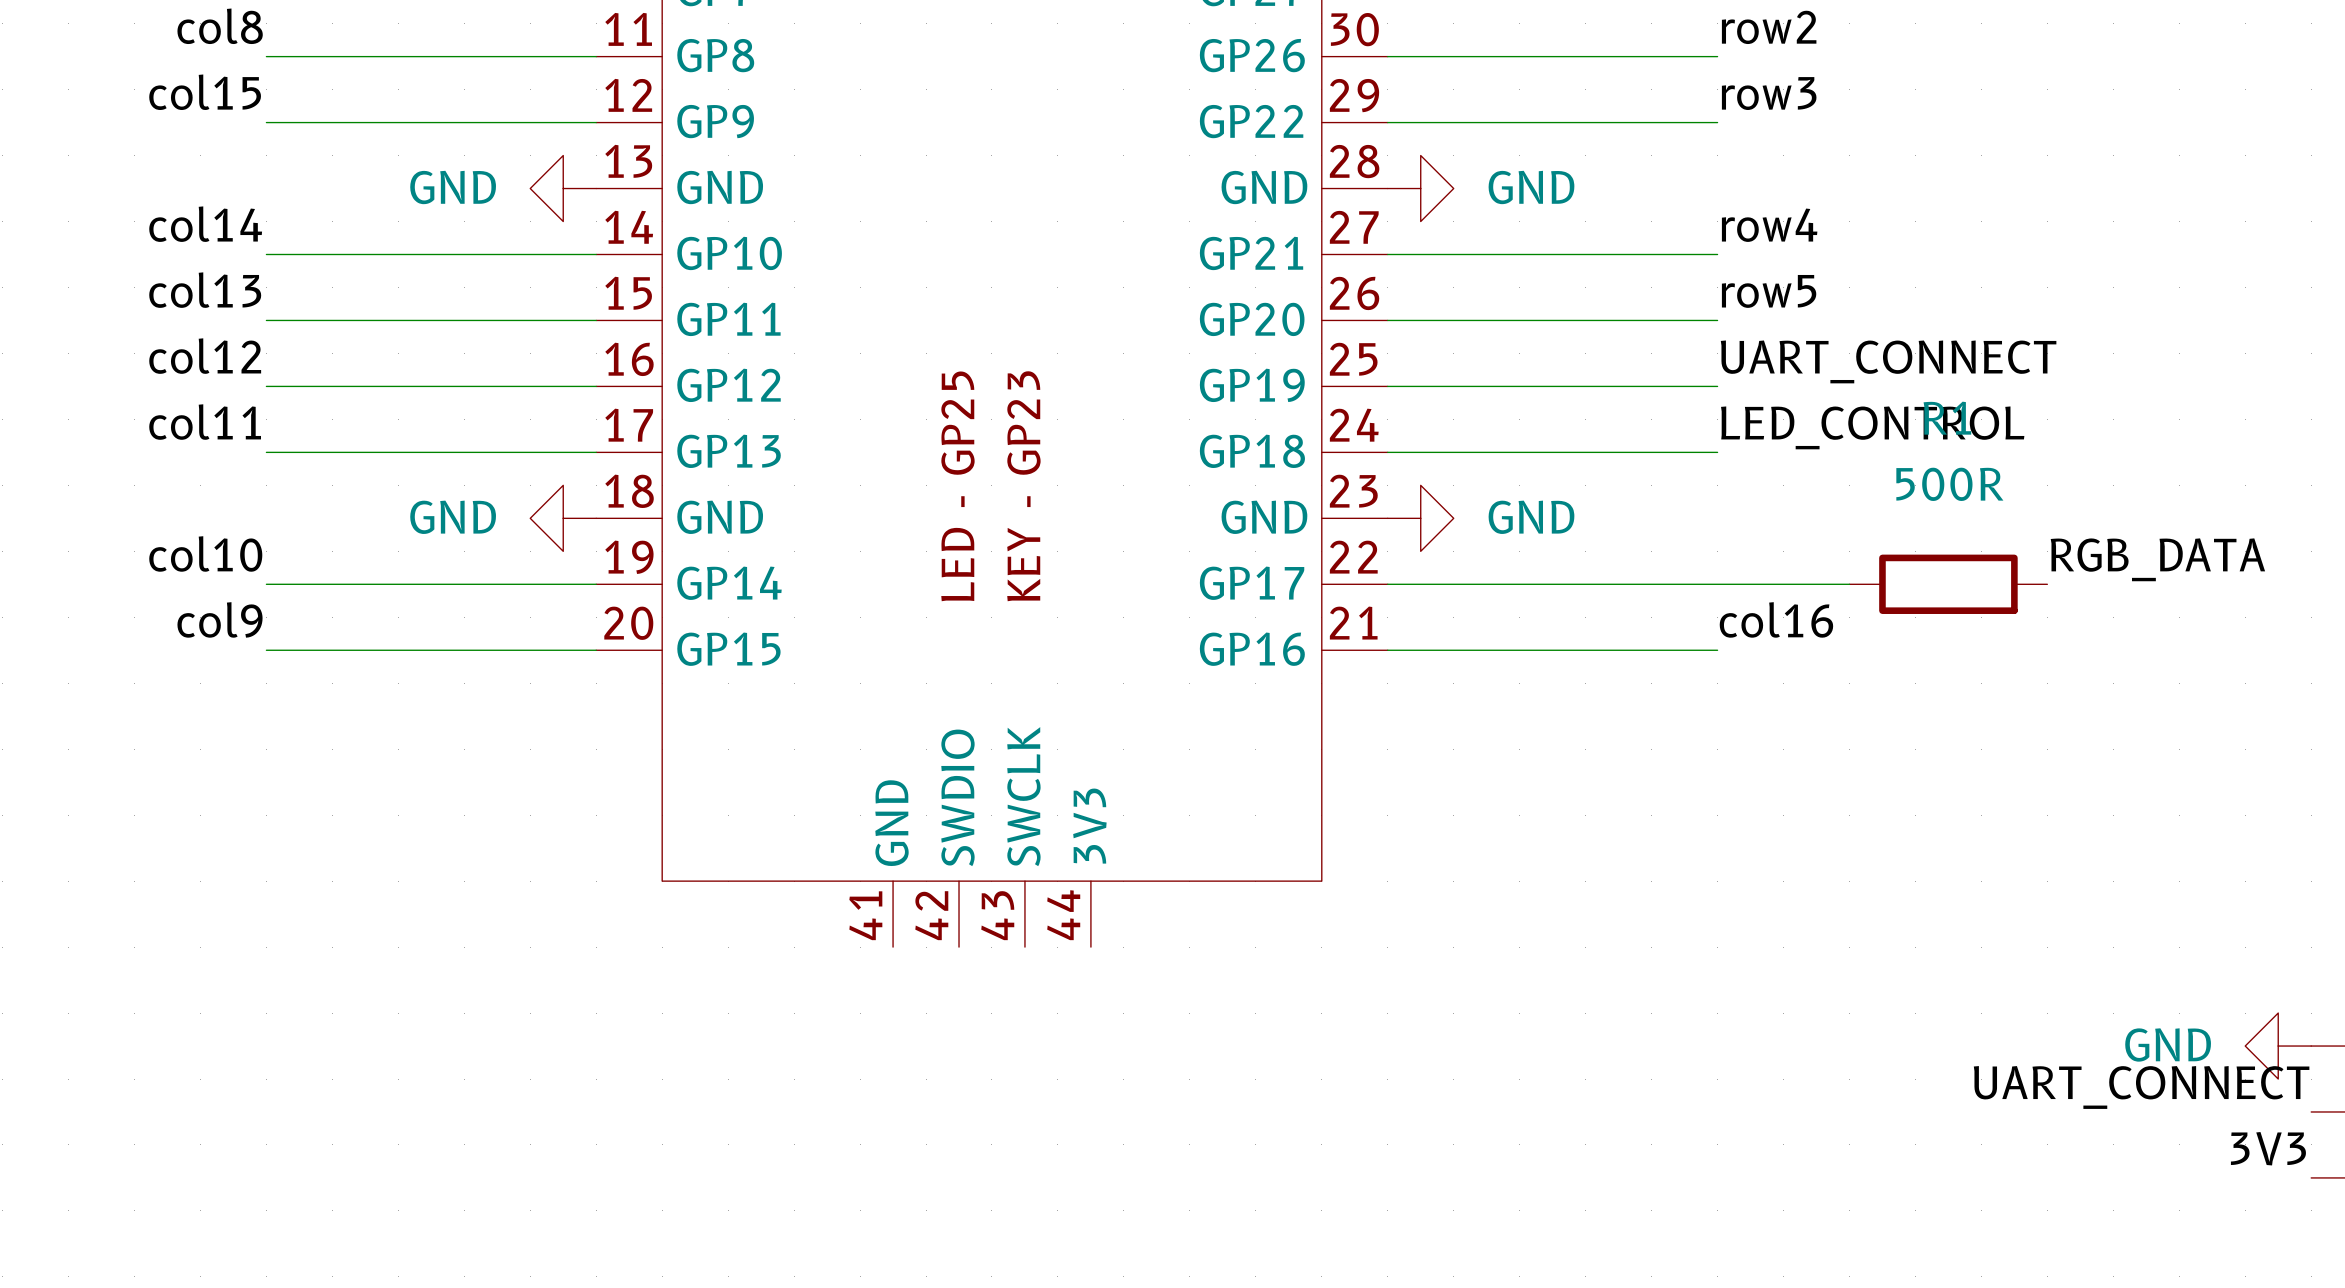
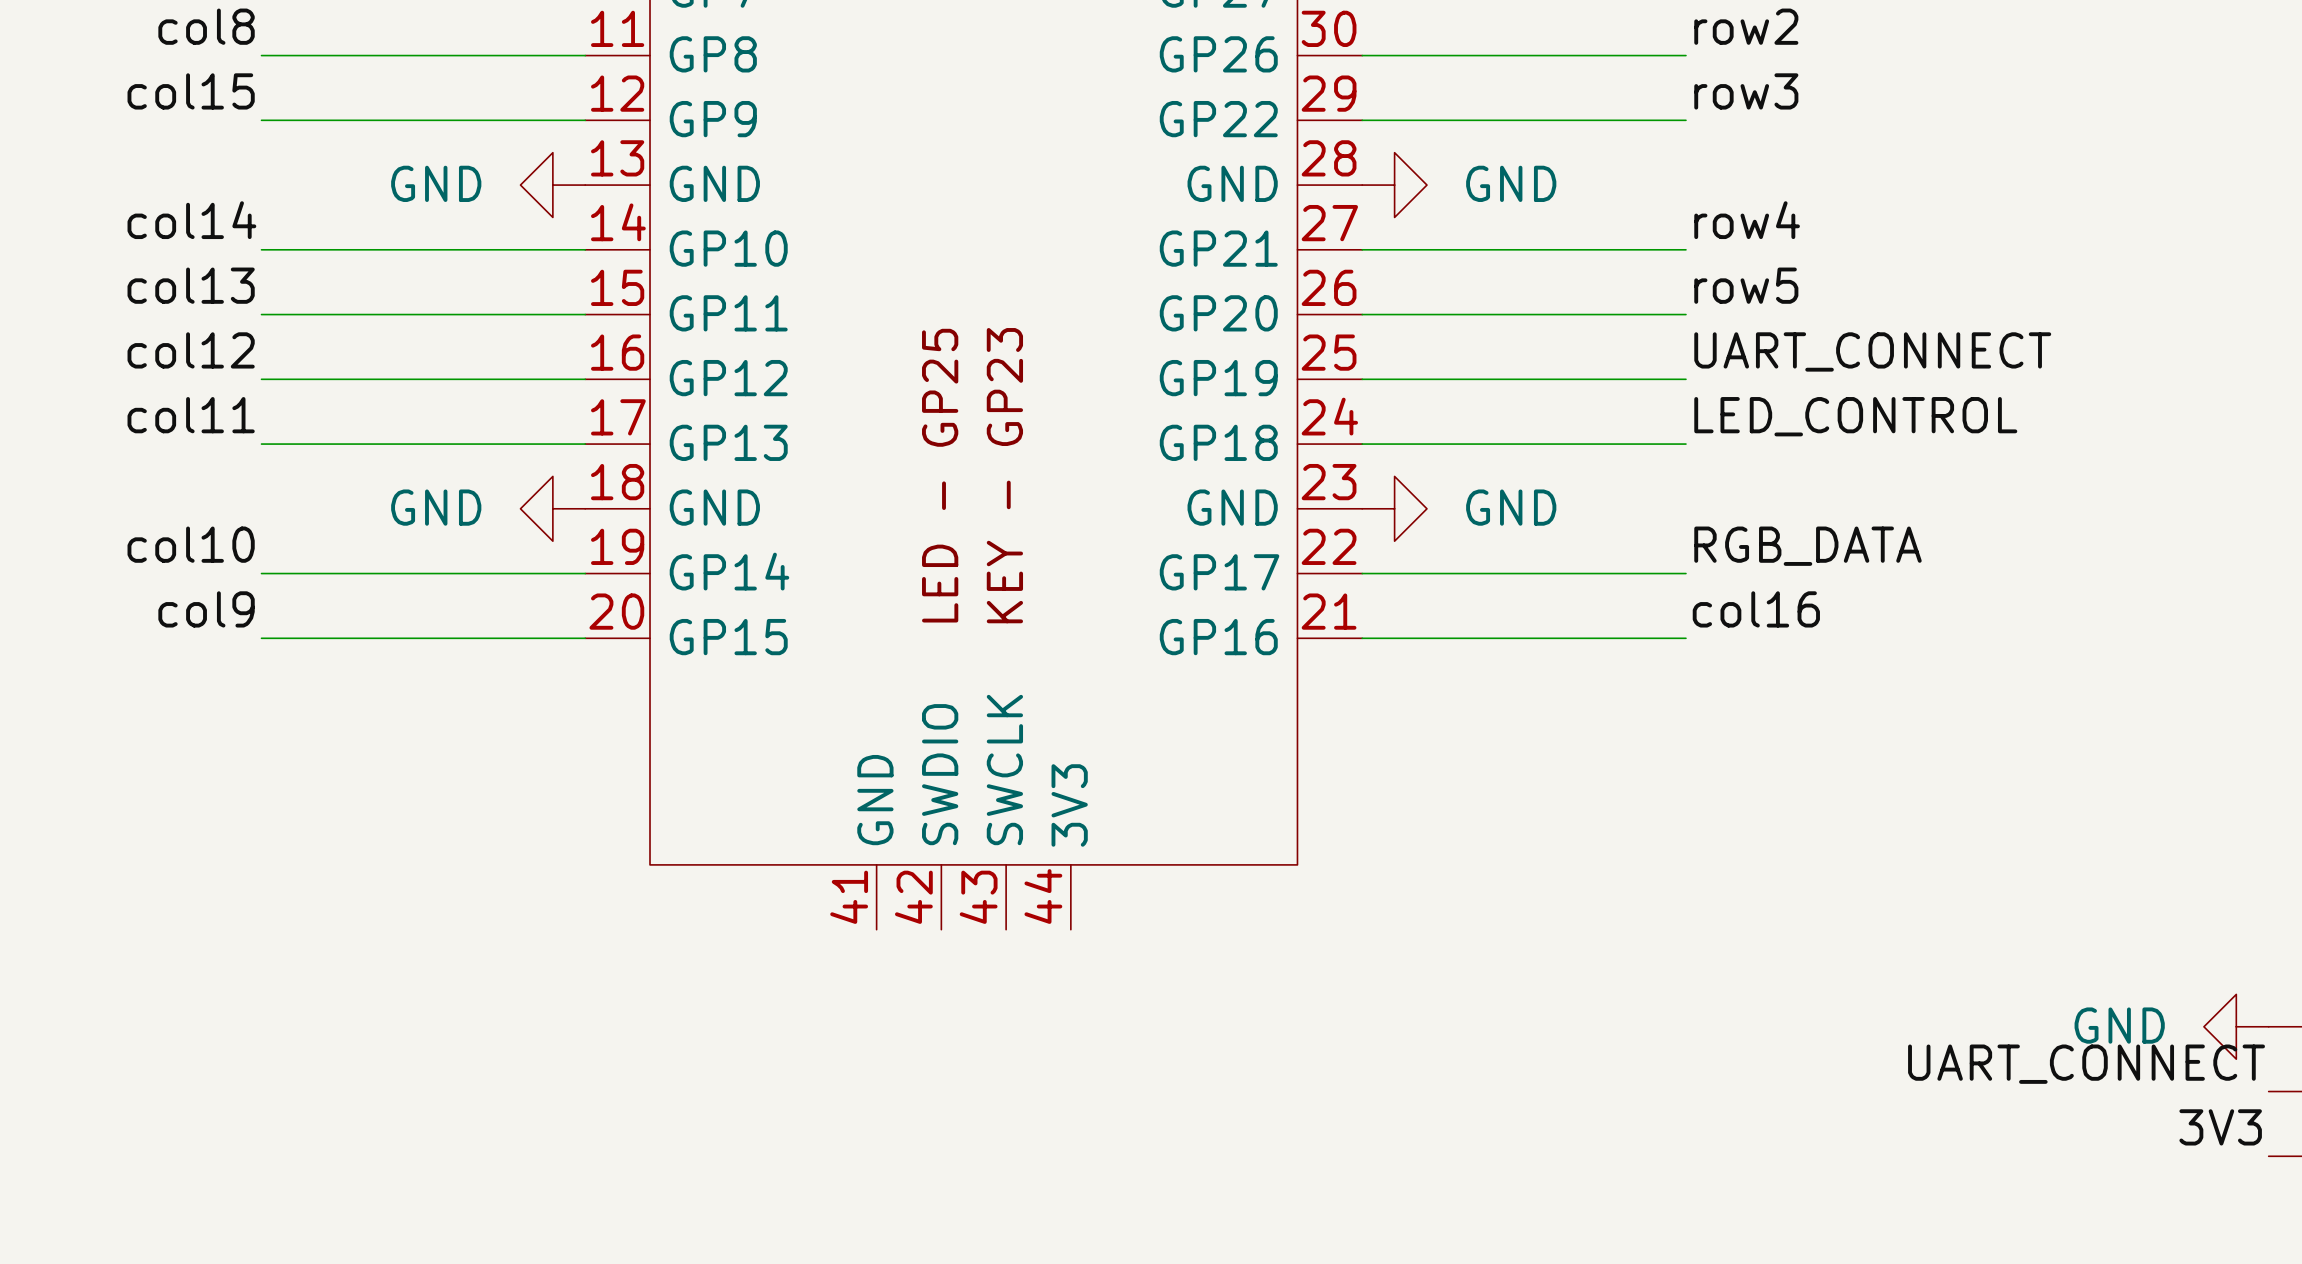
label position: RGB_DATA (2157, 559) -> RGB_DATA (1807, 546)
wire: (1717, 584) (1849, 584) -> none
R1: 500R (1948, 584) -> none

